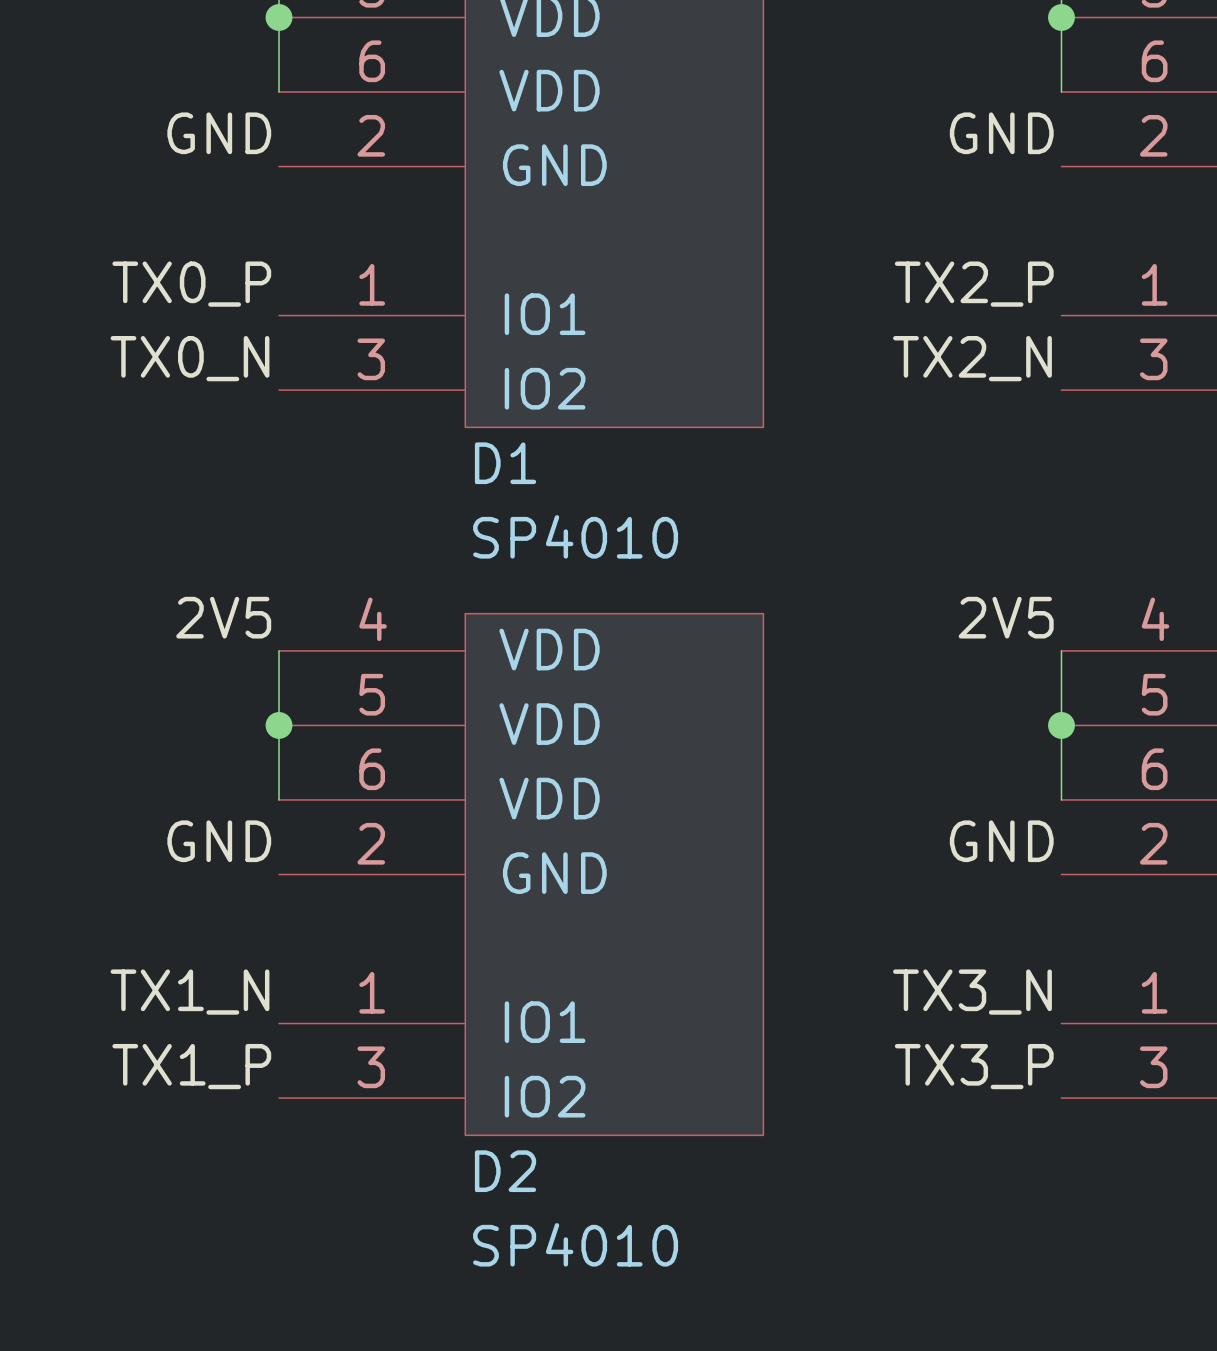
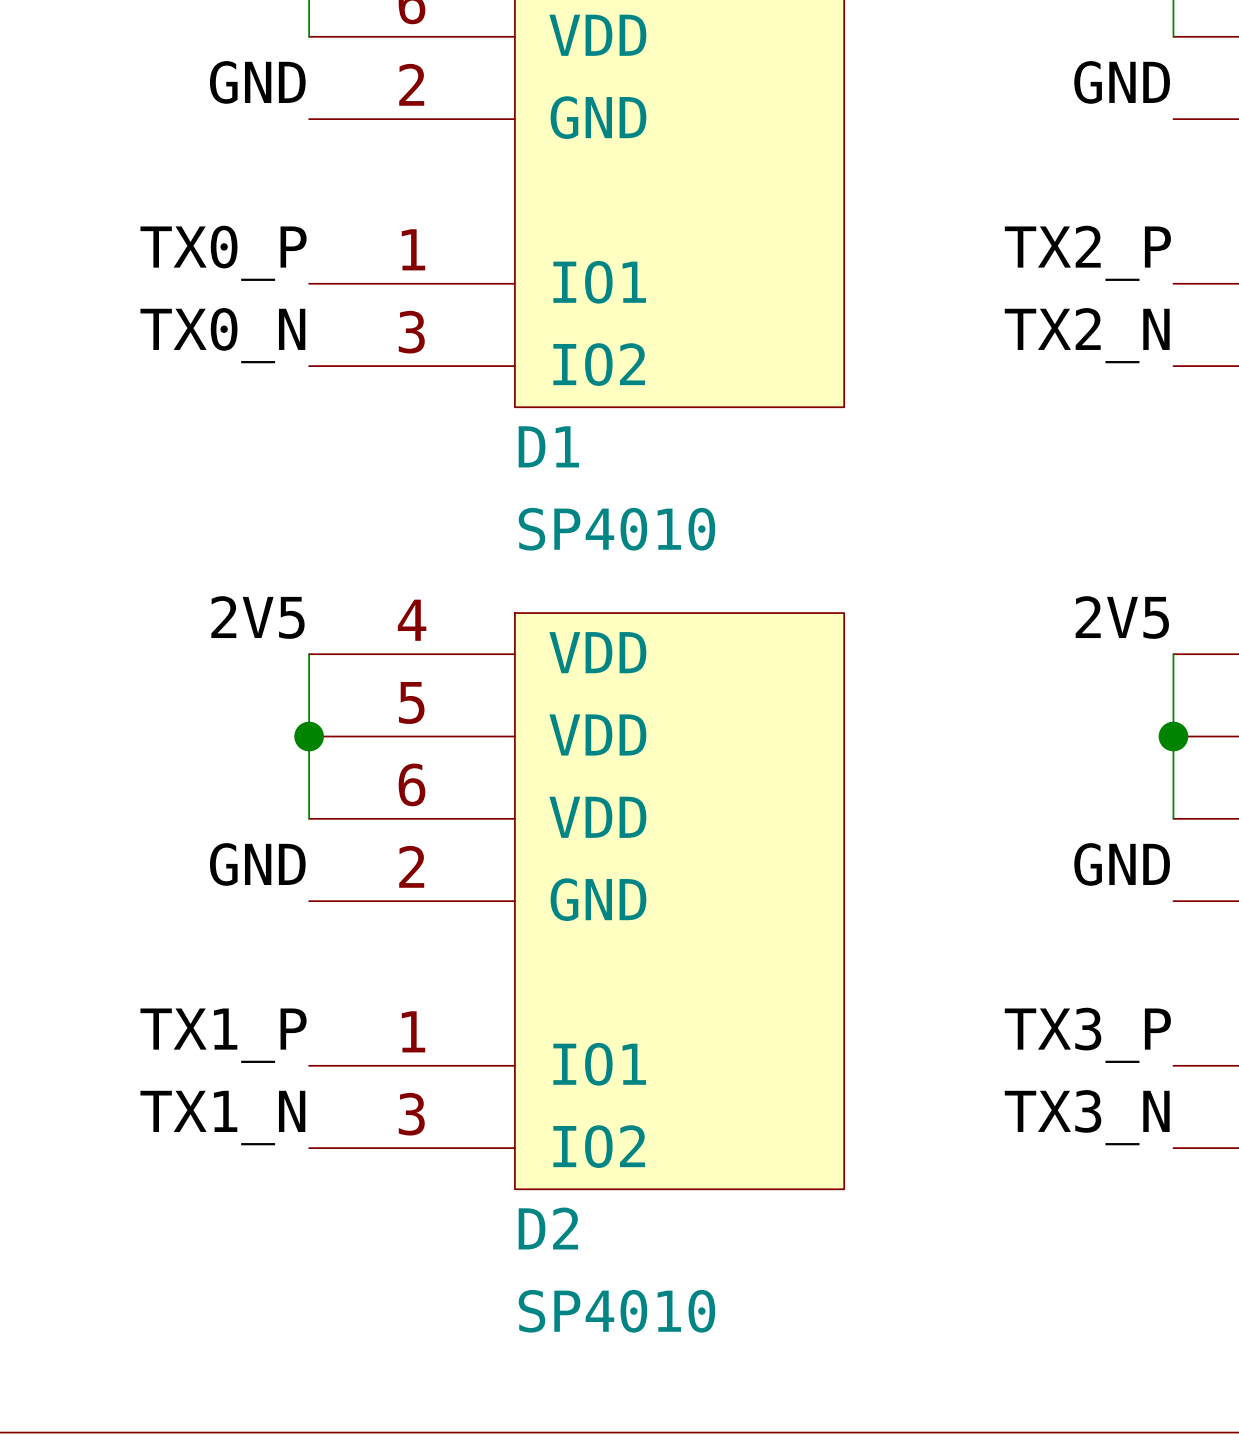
label: TX1_N (190, 992) -> TX1_P (223, 1035)
label: TX3_N (972, 992) -> TX3_P (1087, 1035)
label: TX1_P (191, 1066) -> TX1_N (222, 1118)
label: TX3_P (974, 1066) -> TX3_N (1087, 1117)

